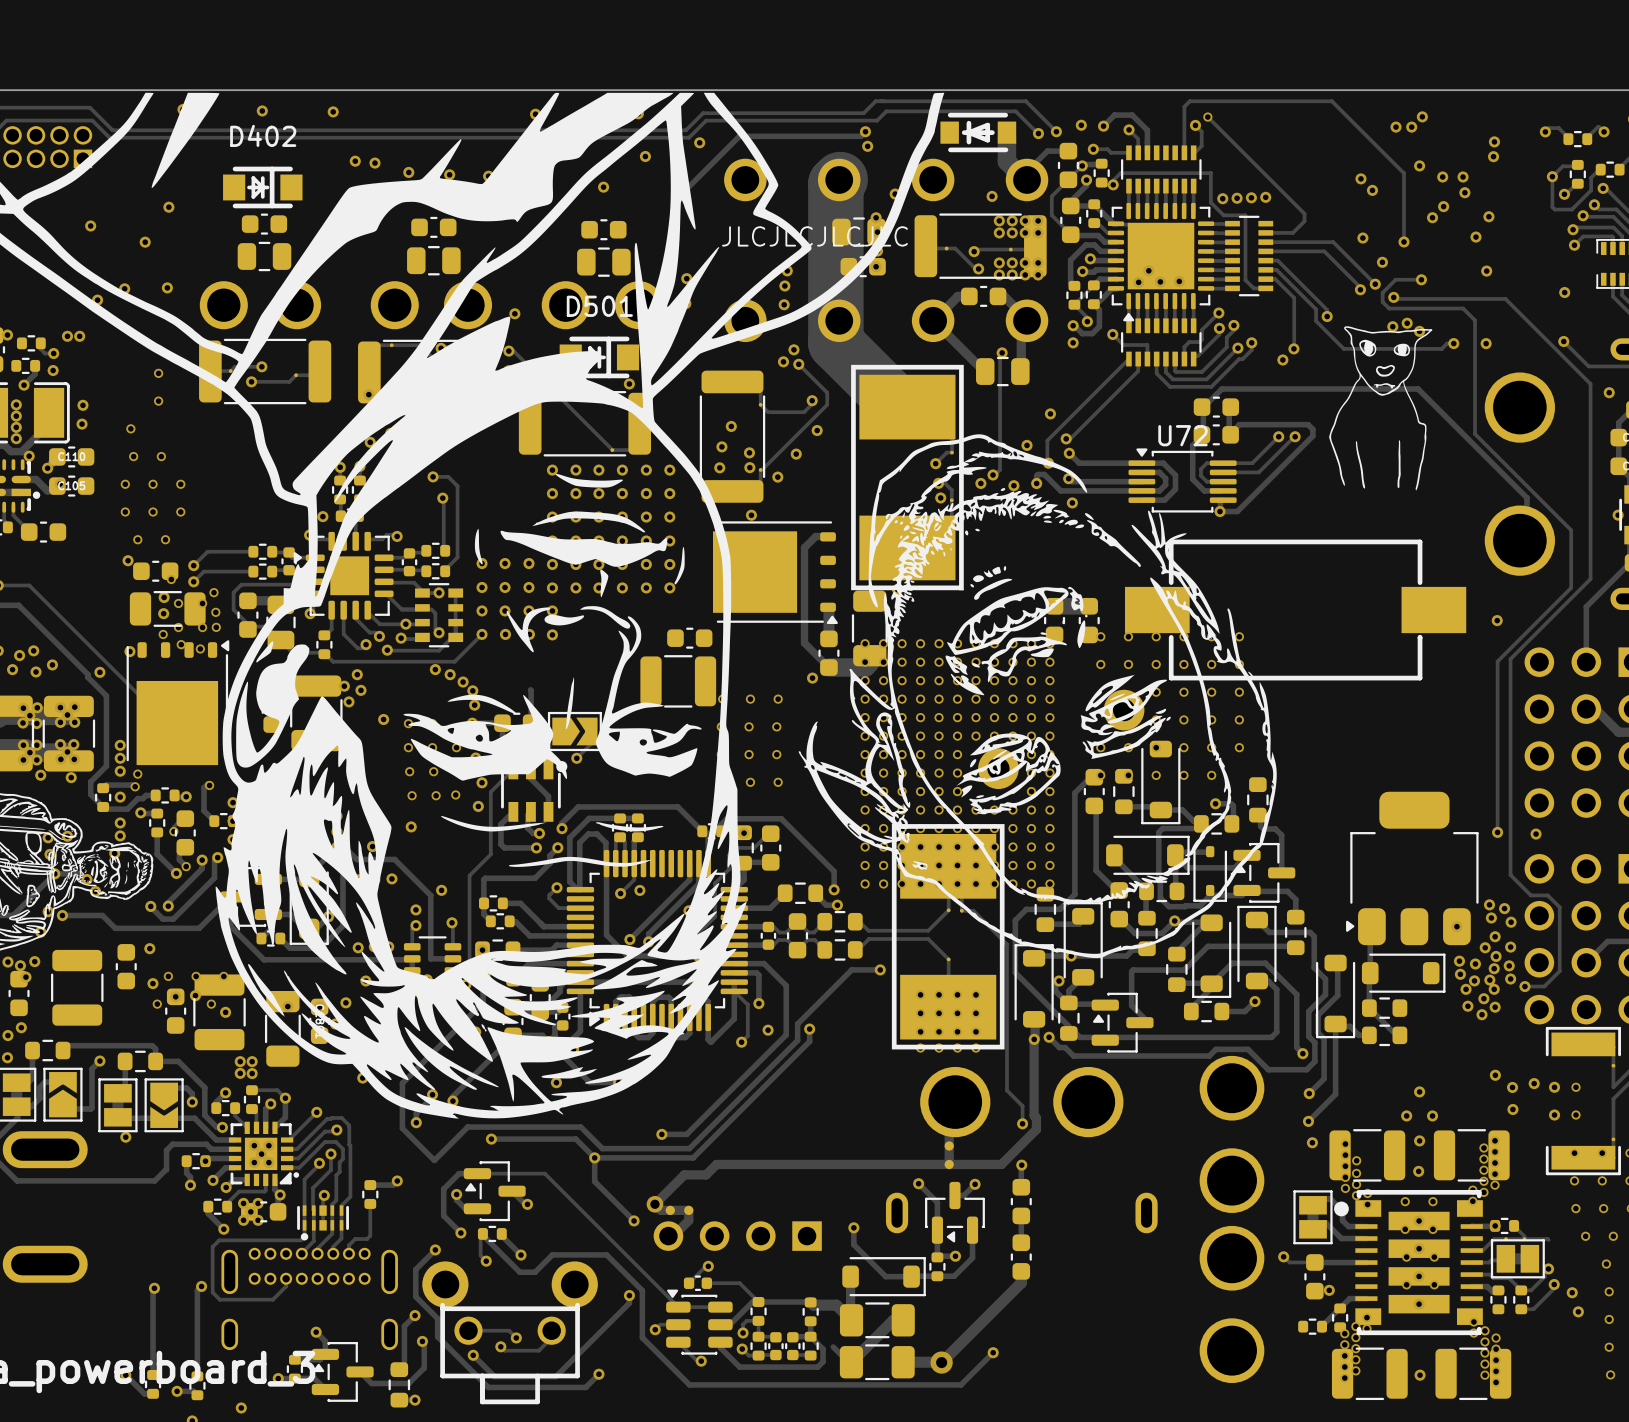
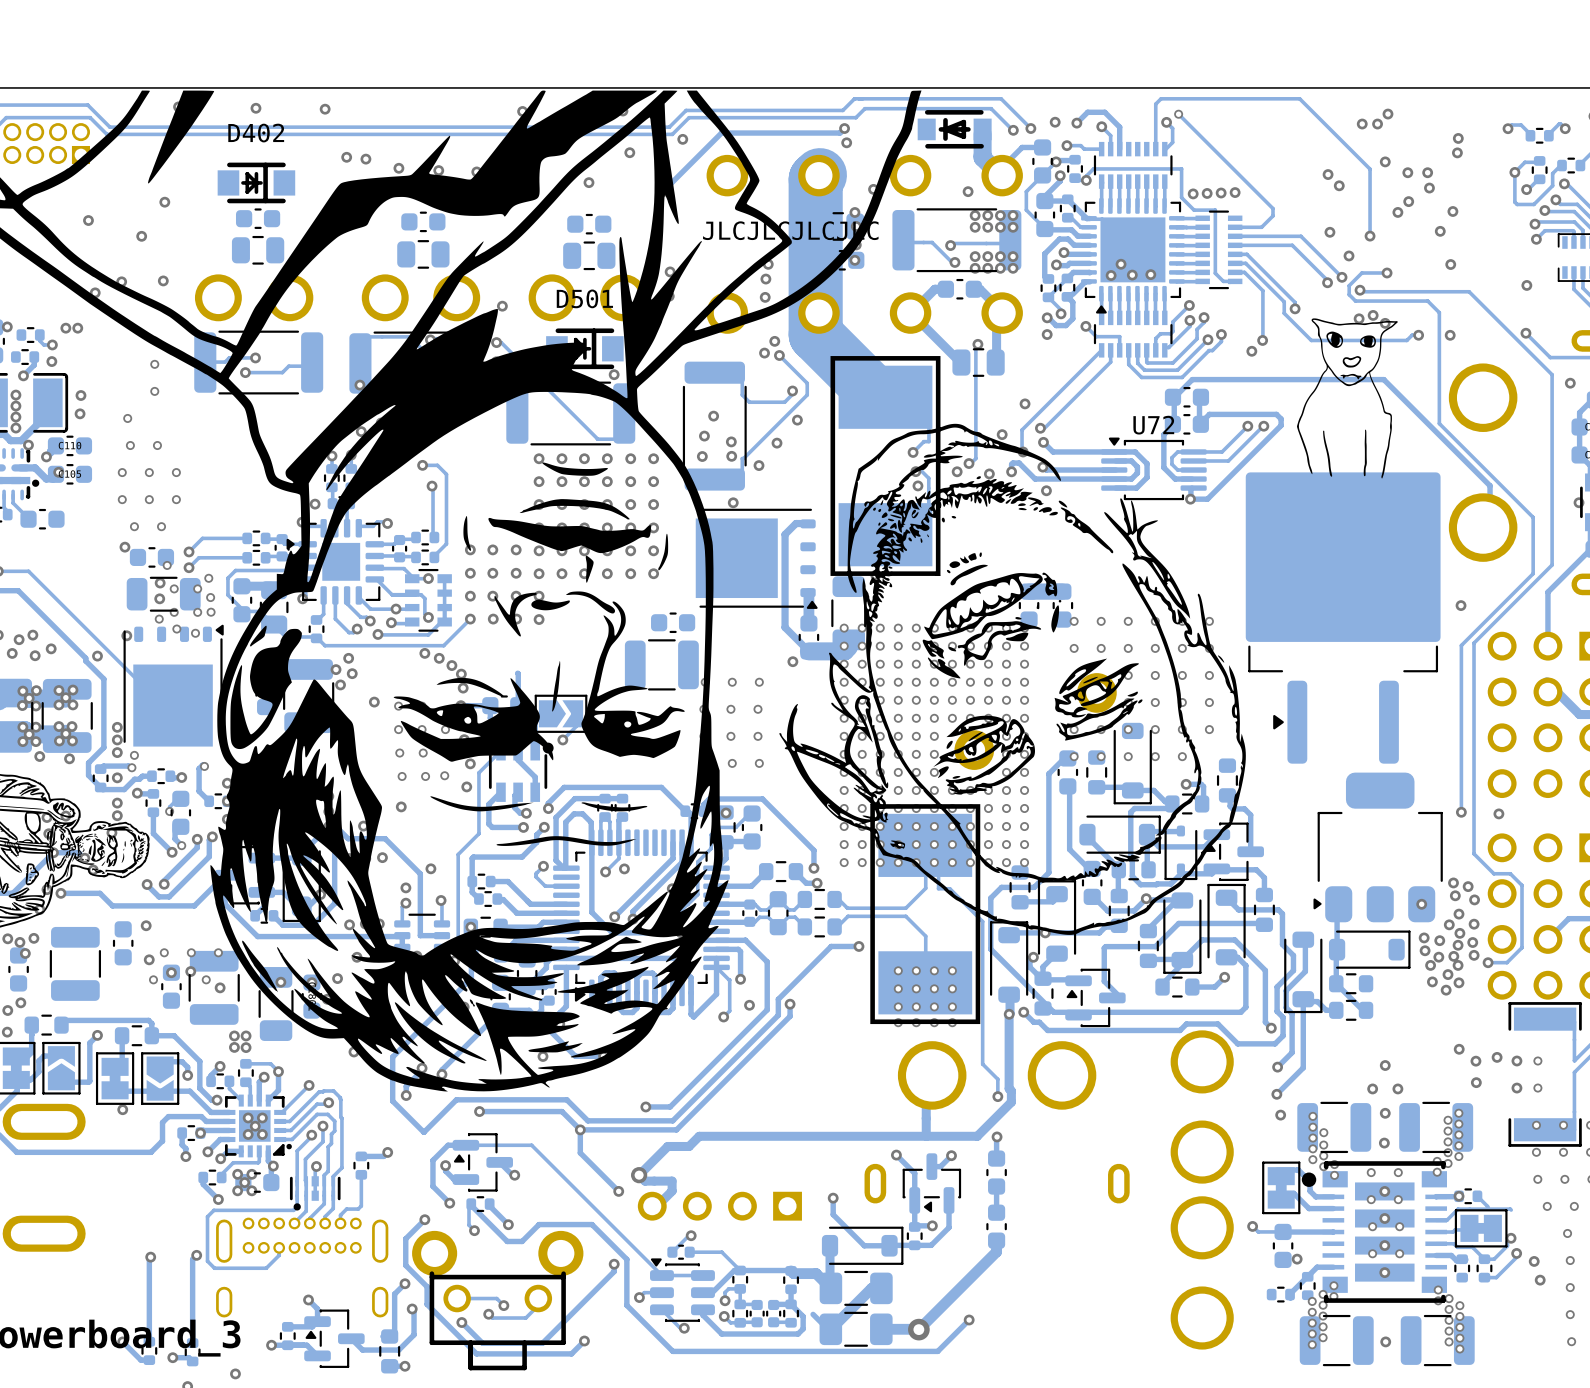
part: (1295, 610) -> none
part: none -> (1343, 618)

